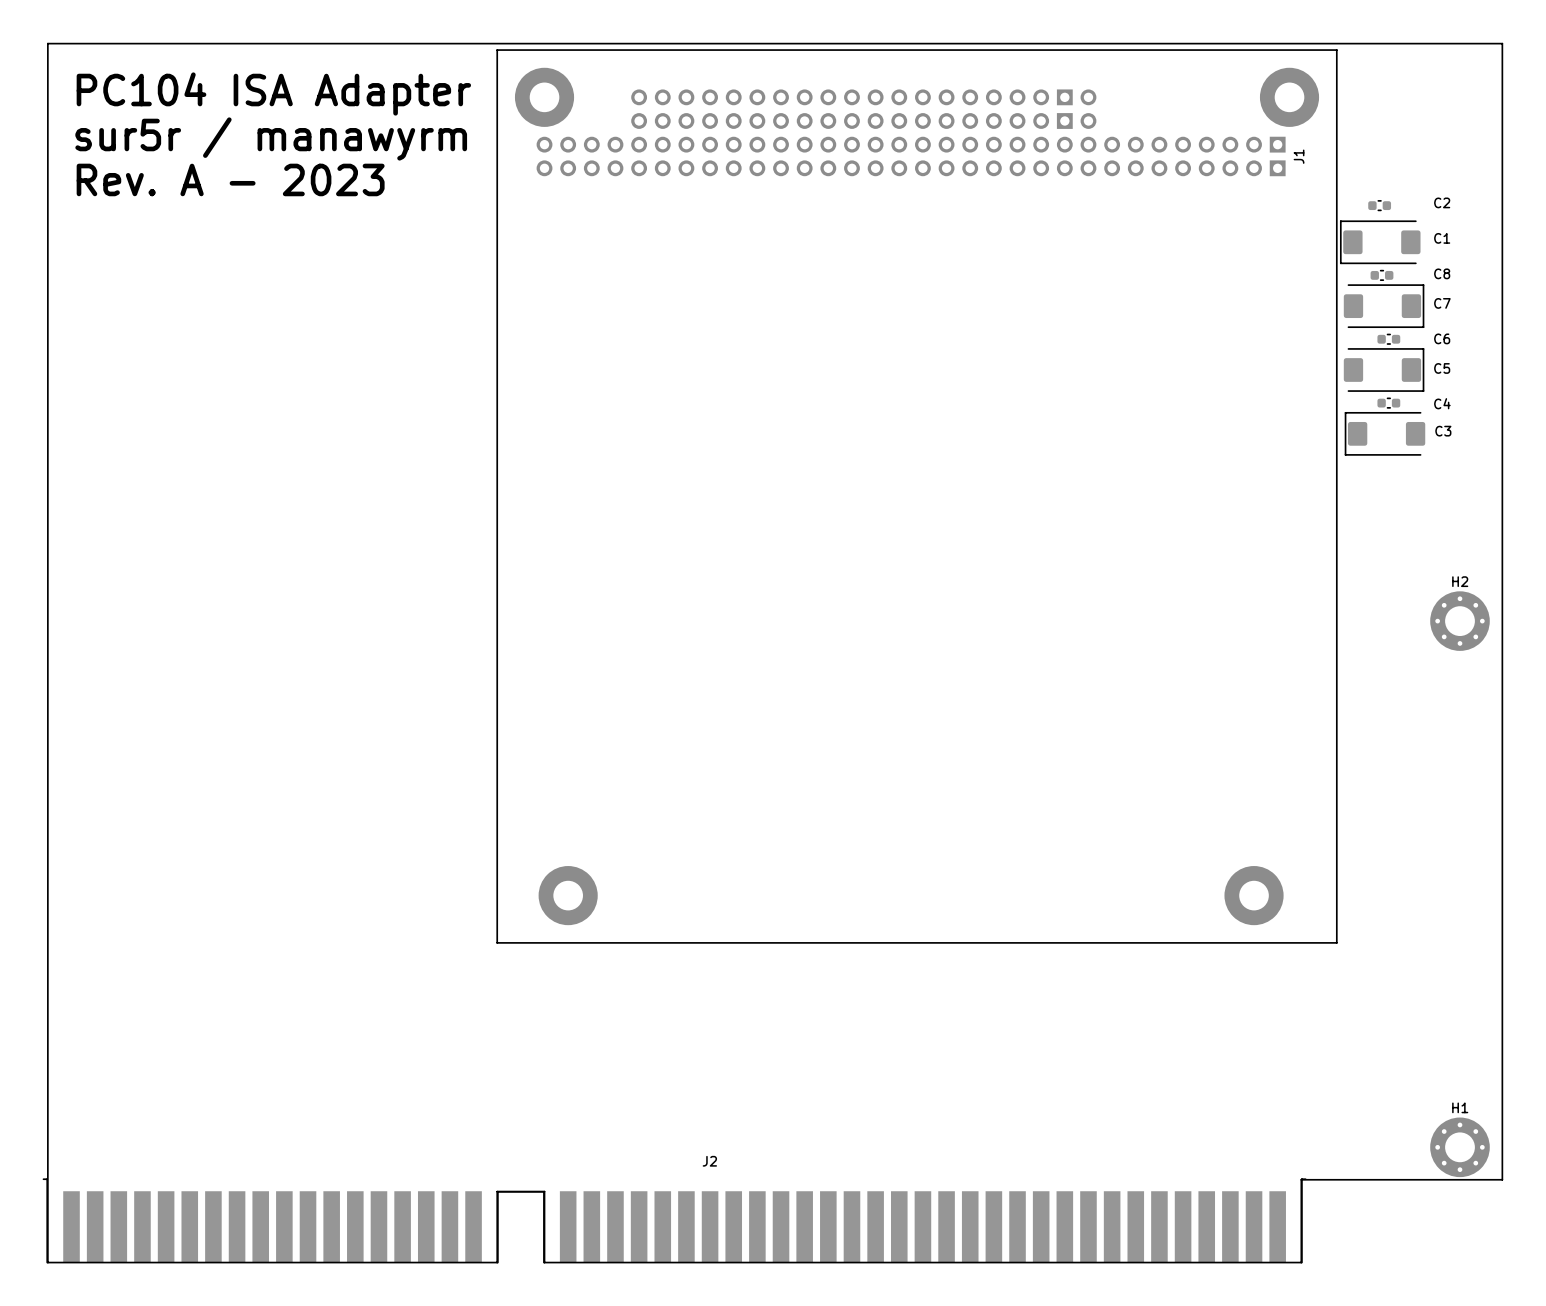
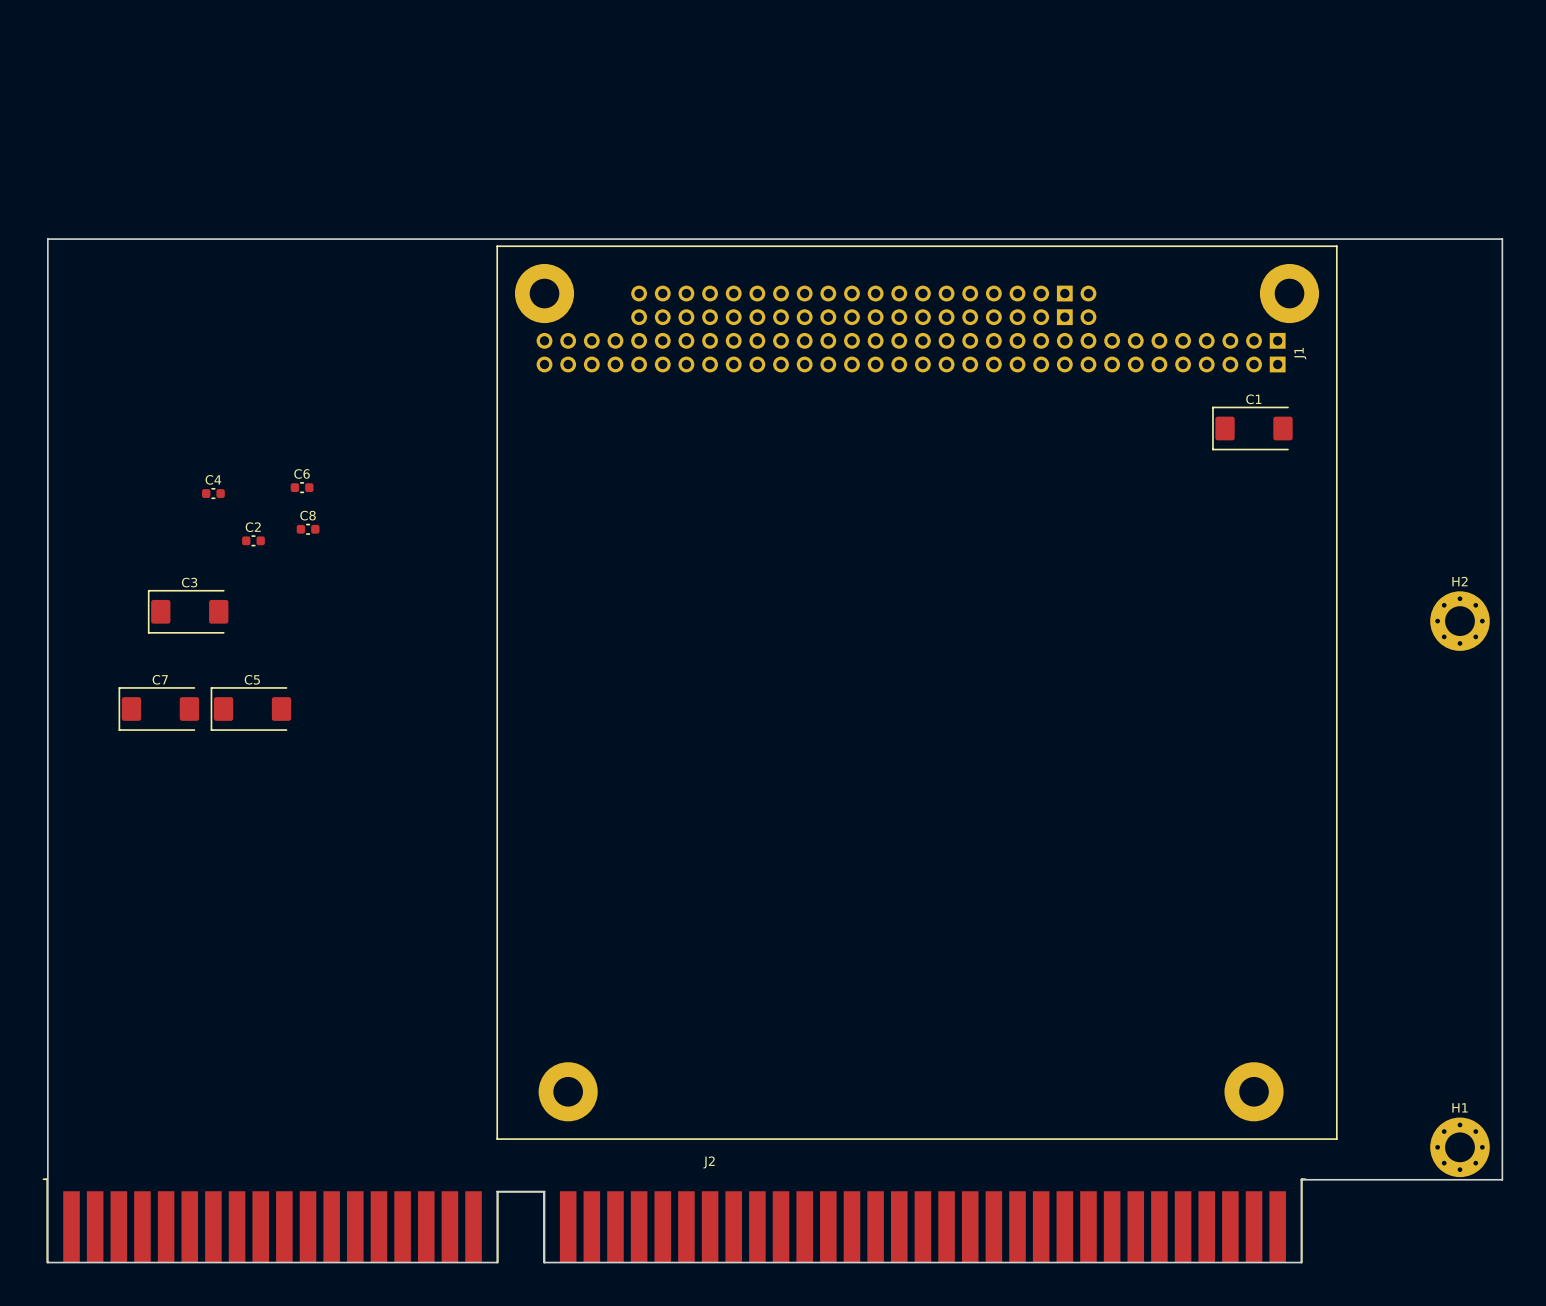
text: PC104 ISA Adapter (273, 94) -> none
text: sur5r / manawyrm (271, 138) -> none
text: Rev. A - 2023 (230, 179) -> none
C2 name position: C2 (1442, 202) -> C2 (253, 527)
C2 position: (1379, 205) -> (253, 540)
C1 name position: C1 (1442, 238) -> C1 (1253, 399)
board edge: (47, 239) (47, 43) (1502, 43) (1502, 239) -> (47, 239) (1502, 239)
C1 position: (1380, 242) -> (1252, 428)
C8 name position: C8 (1442, 273) -> C8 (308, 515)
C8 position: (1381, 275) -> (308, 529)
C7 name position: C7 (1442, 303) -> C7 (160, 679)
C7 rotation: 0° (1383, 306) -> 180° (158, 709)
C7 position: (1383, 306) -> (158, 709)
C6 name position: C6 (1442, 338) -> C6 (302, 473)
C6 position: (1388, 339) -> (302, 487)
C5 name position: C5 (1442, 368) -> C5 (252, 679)
C5 rotation: 0° (1383, 370) -> 180° (251, 709)
C5 position: (1383, 370) -> (251, 709)
C4 position: (1388, 403) -> (213, 493)
C4 name position: C4 (1442, 403) -> C4 (213, 479)
C3 name position: C3 (1443, 431) -> C3 (189, 582)
C3 position: (1385, 433) -> (188, 611)
J1 position: (917, 496) -> (917, 692)

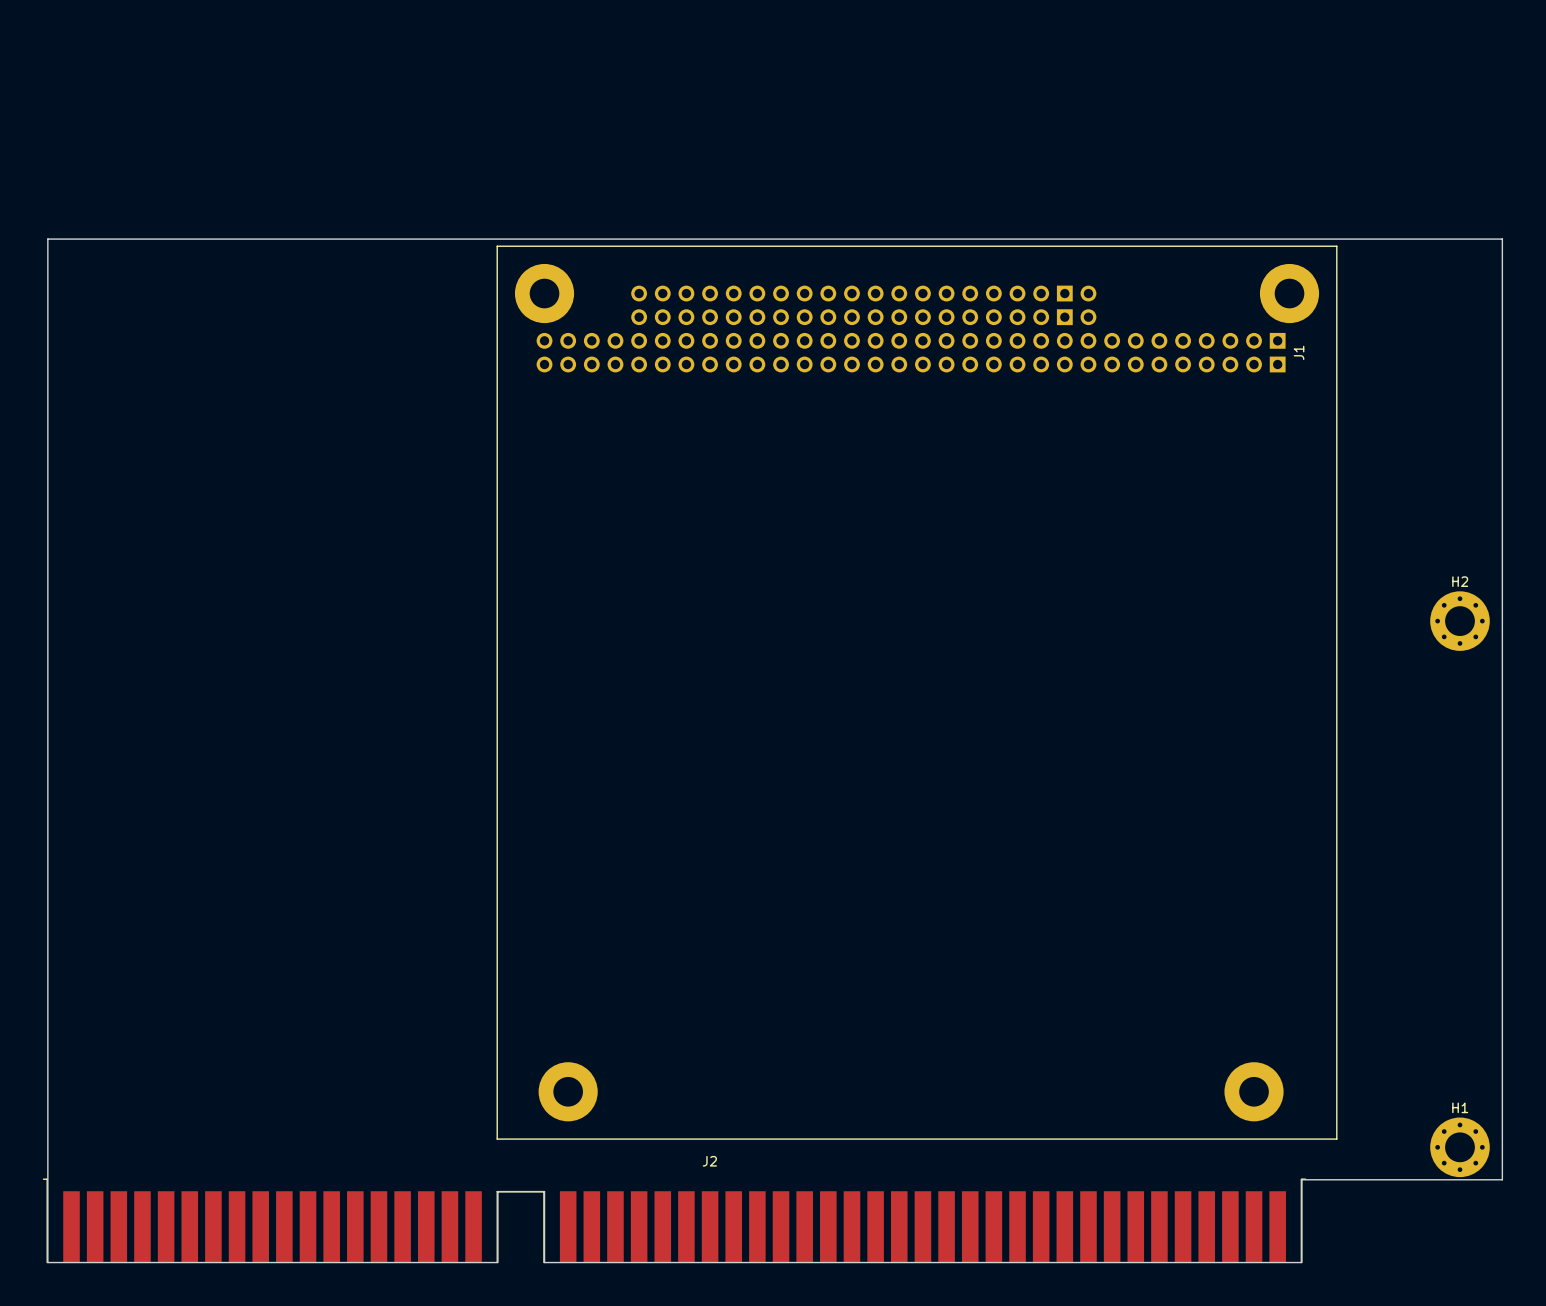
C1: (1252, 428) -> none
C6: (302, 487) -> none
C4: (213, 493) -> none
C8: (308, 529) -> none
C2: (253, 540) -> none
C3: (188, 611) -> none
C7: (158, 709) -> none
C5: (251, 709) -> none

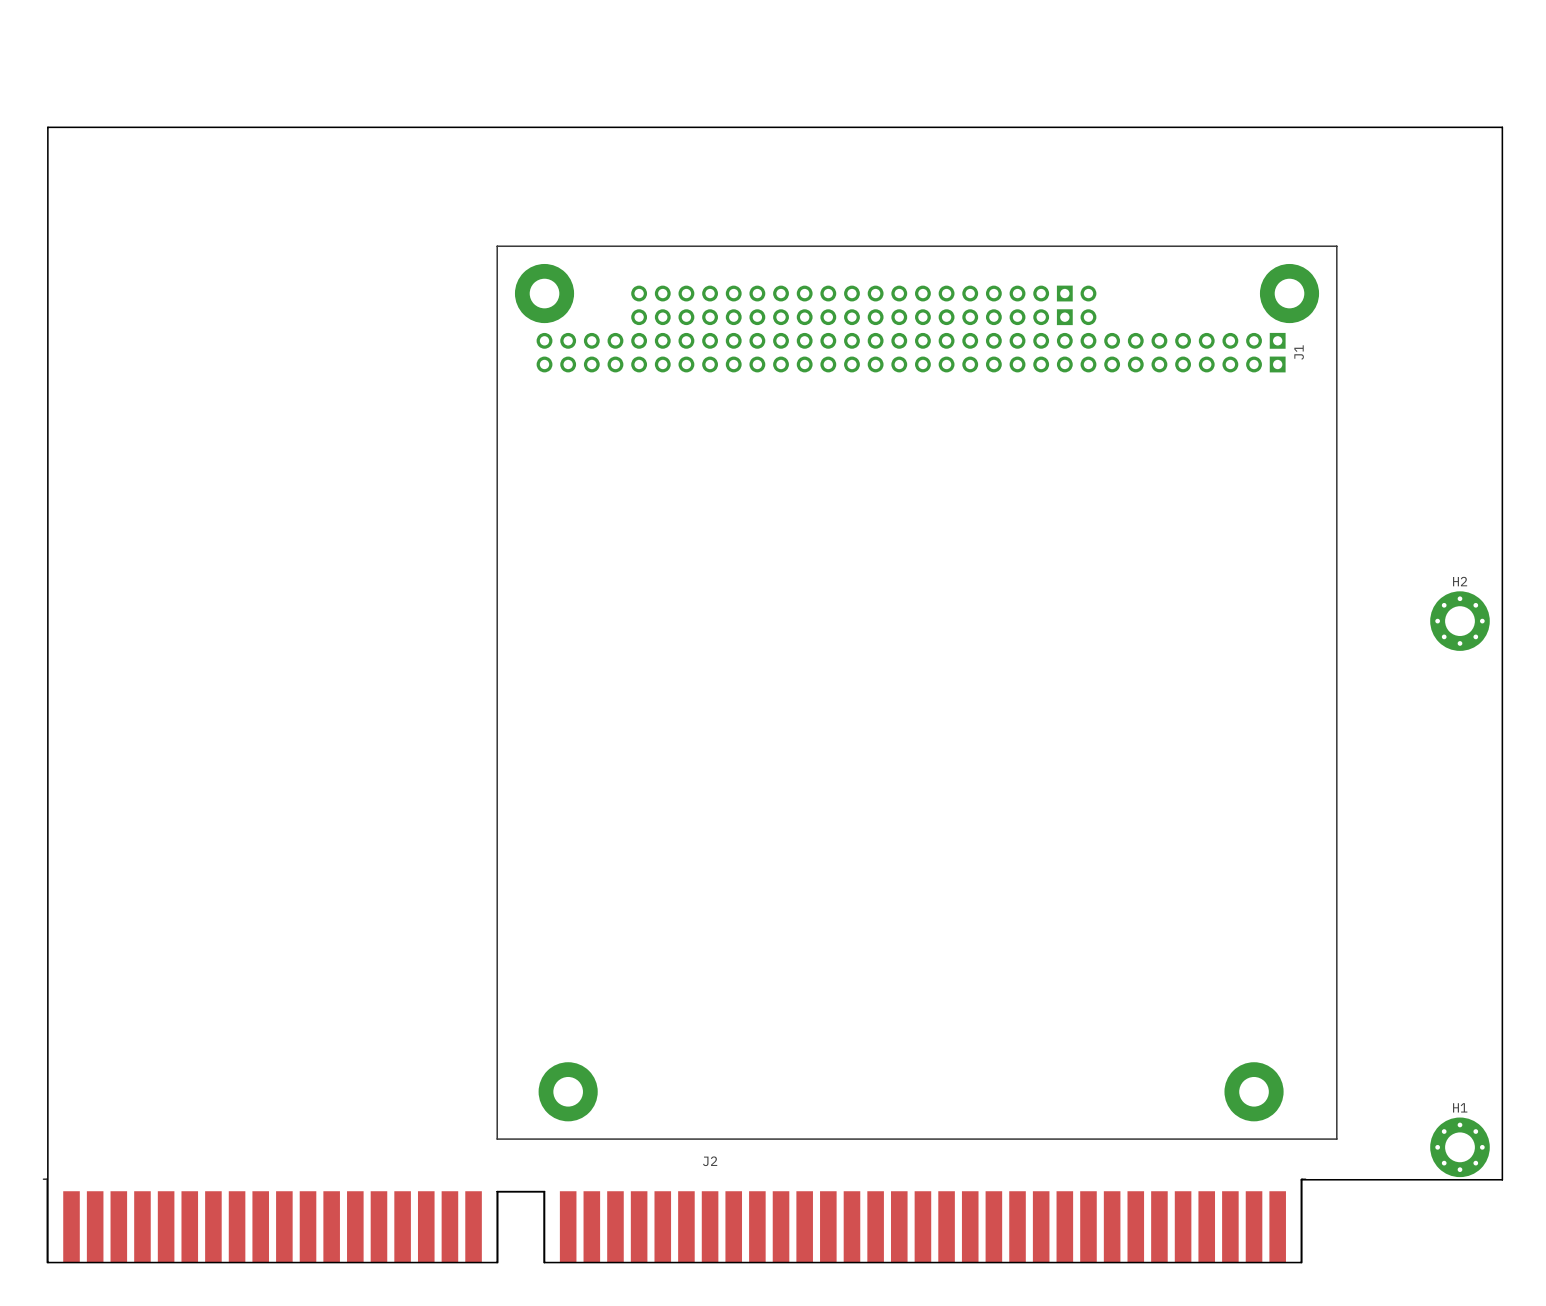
board edge: (47, 239) (1502, 239) -> (47, 239) (47, 127) (1502, 127) (1502, 239)

